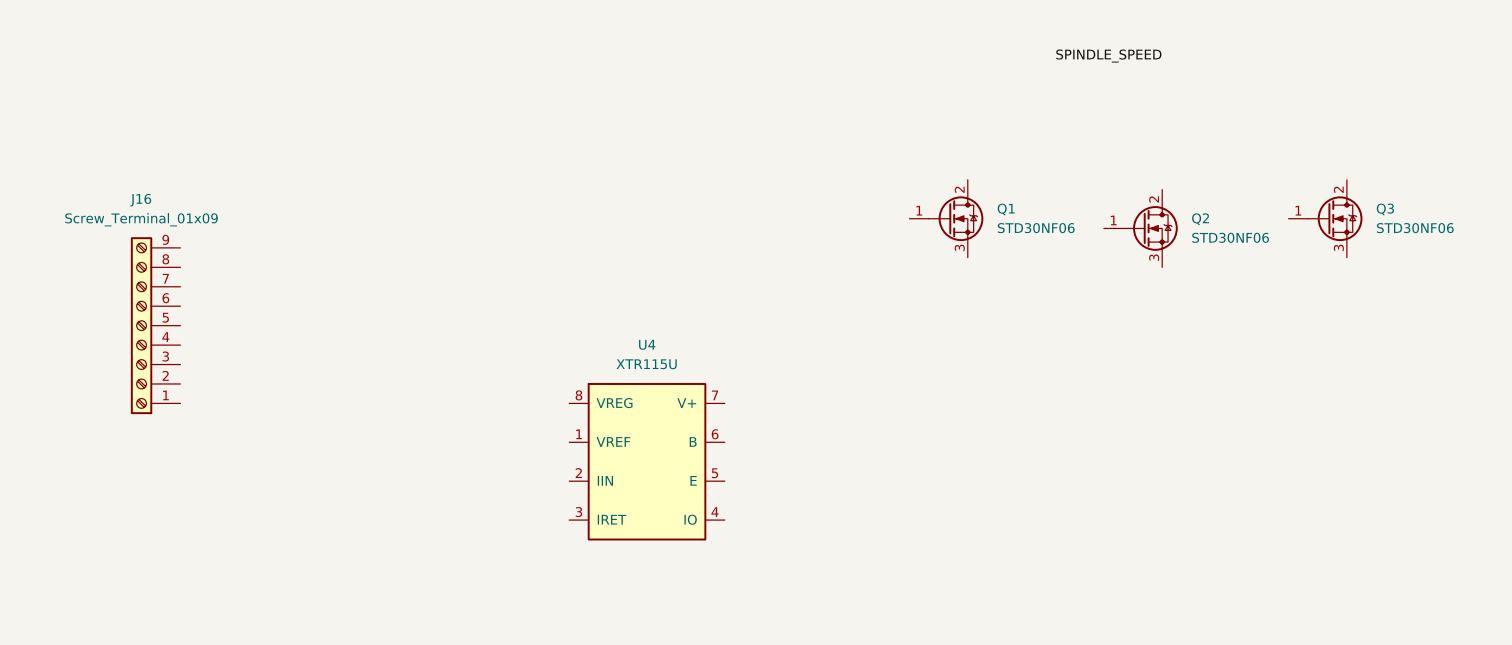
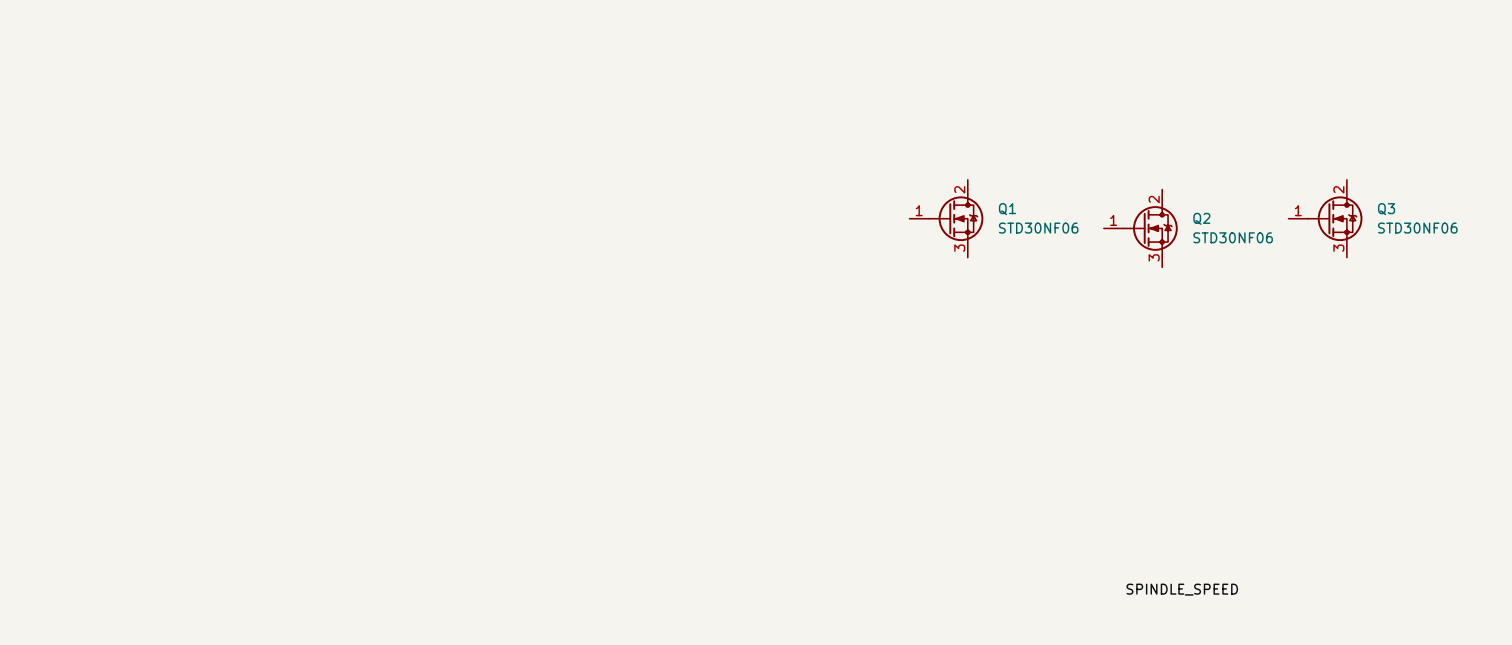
label: SPINDLE_SPEED (1108, 56) -> none
J16: Screw_Terminal_01x09 (155, 325) -> none
U4: XTR115U (647, 461) -> none
label: none -> SPINDLE_SPEED (1182, 589)

